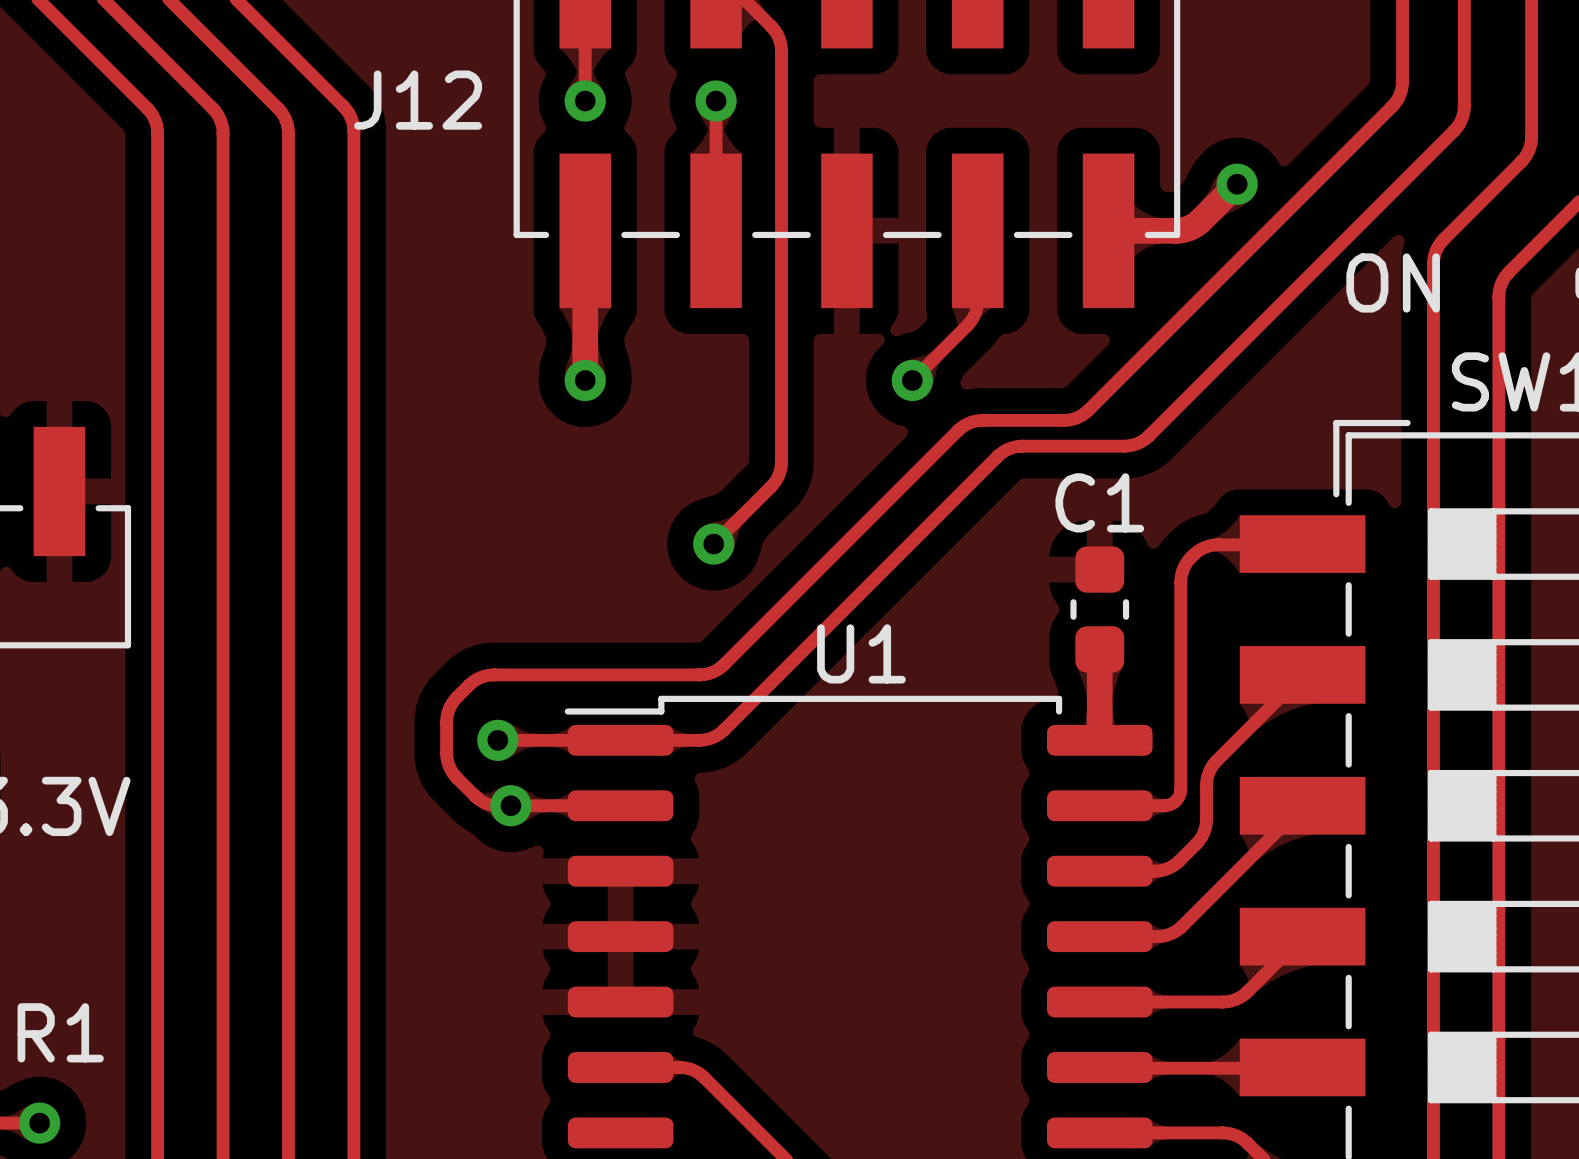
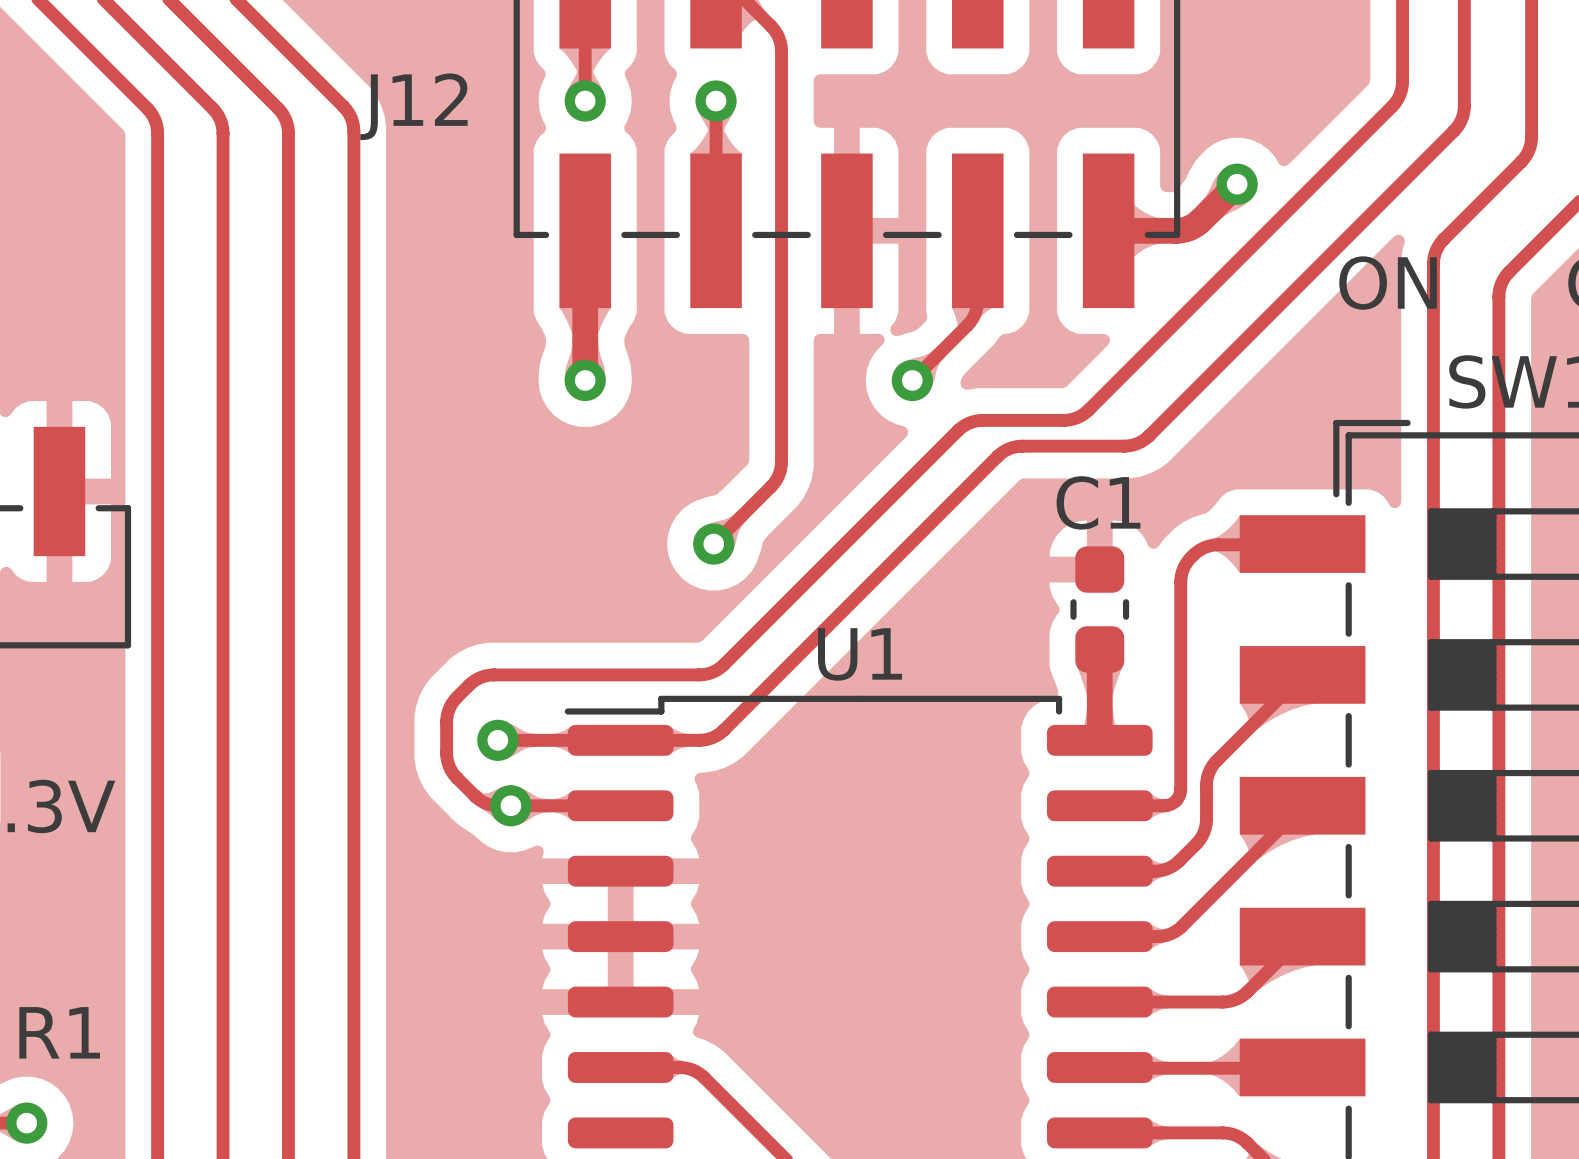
via position: (39, 1123) -> (26, 1123)

